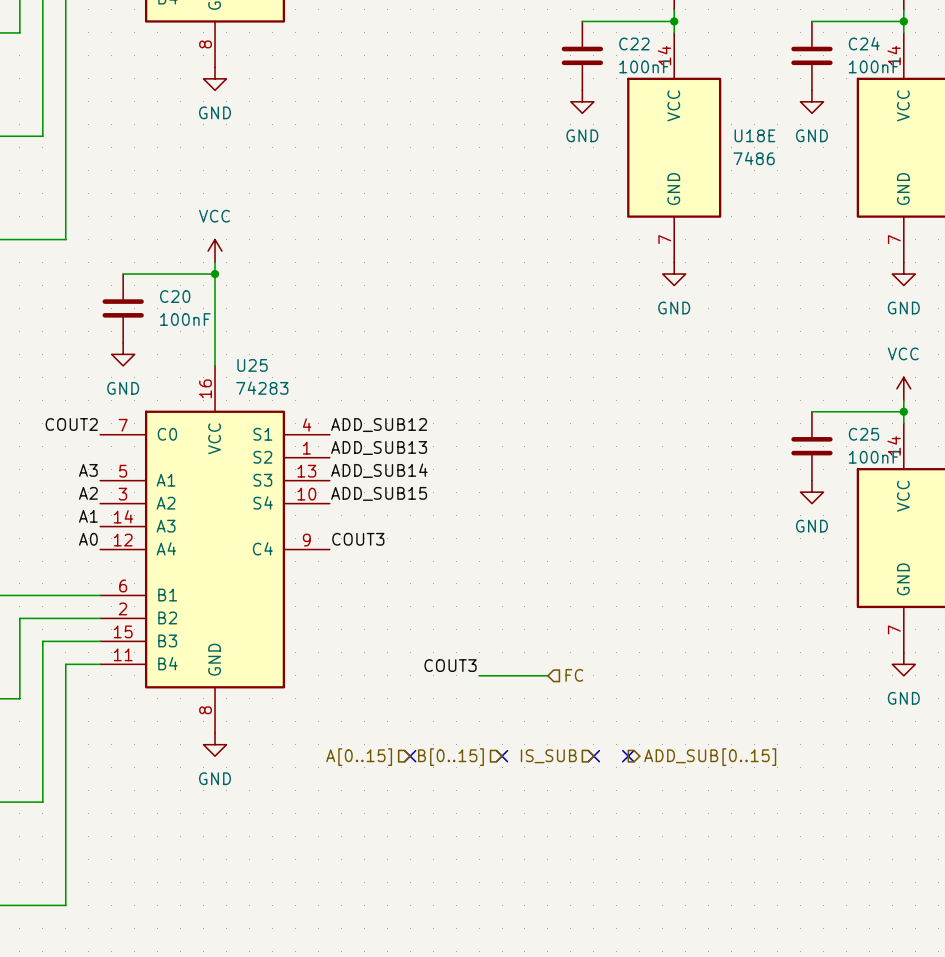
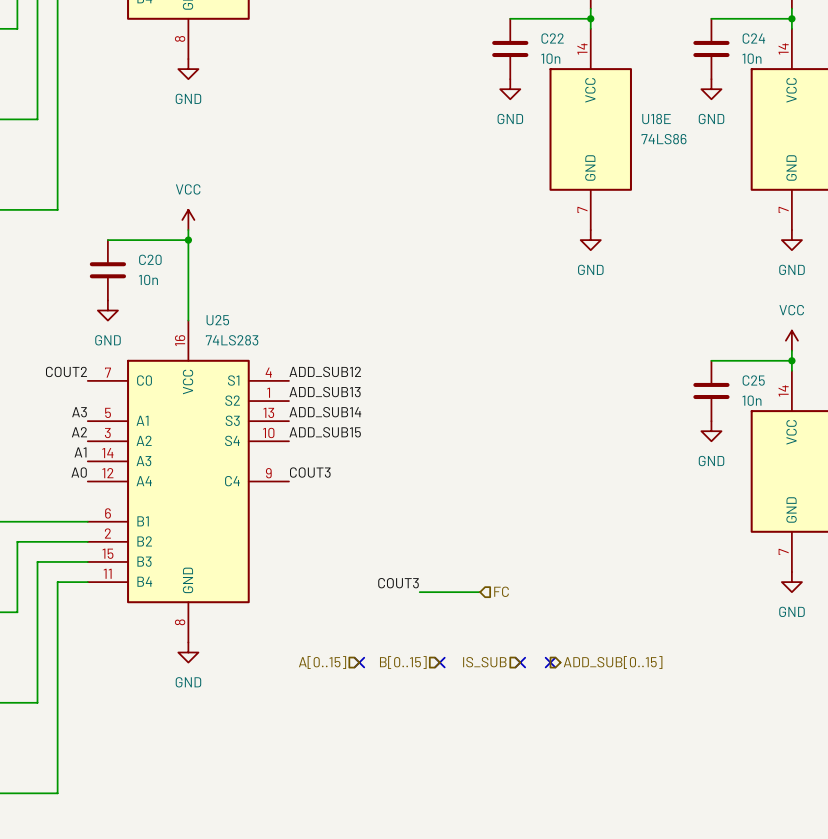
C22 value: 100nF (644, 66) -> 10n (550, 58)
C24 value: 100nF (874, 66) -> 10n (751, 58)
U18E value: 7486 (754, 158) -> 74LS86 (664, 139)
C20 value: 100nF (185, 319) -> 10n (148, 279)
U25 value: 74283 (262, 388) -> 74LS283 (232, 340)
C25 value: 100nF (874, 457) -> 10n (751, 400)

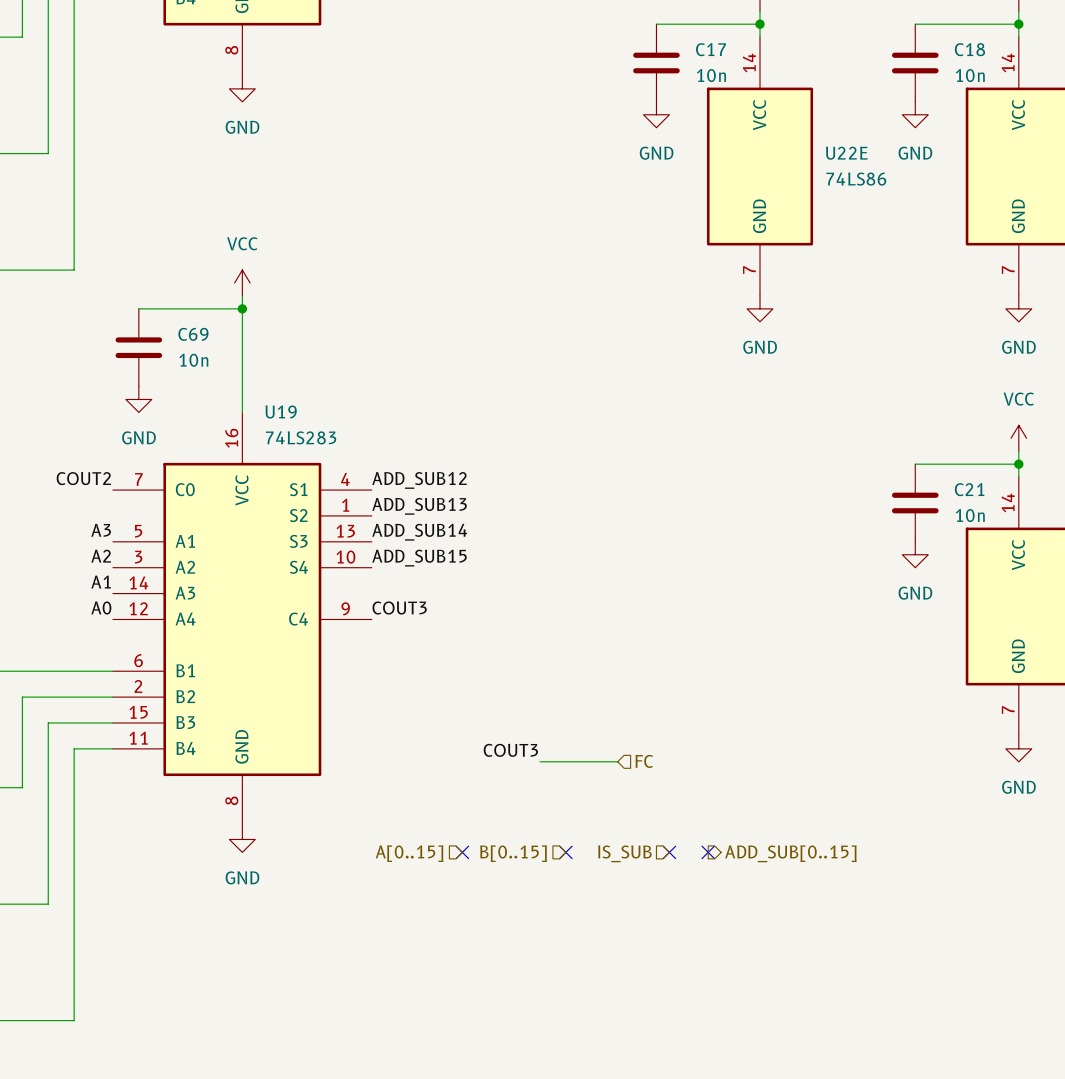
C22 name: C22 (552, 38) -> C17 (711, 49)
C24 name: C24 (753, 38) -> C18 (969, 49)
U18E name: U18E (656, 119) -> U22E (846, 153)
C20 name: C20 (150, 259) -> C69 (193, 334)
U25 name: U25 (217, 320) -> U19 (281, 412)
C25 name: C25 (753, 380) -> C21 (969, 489)

